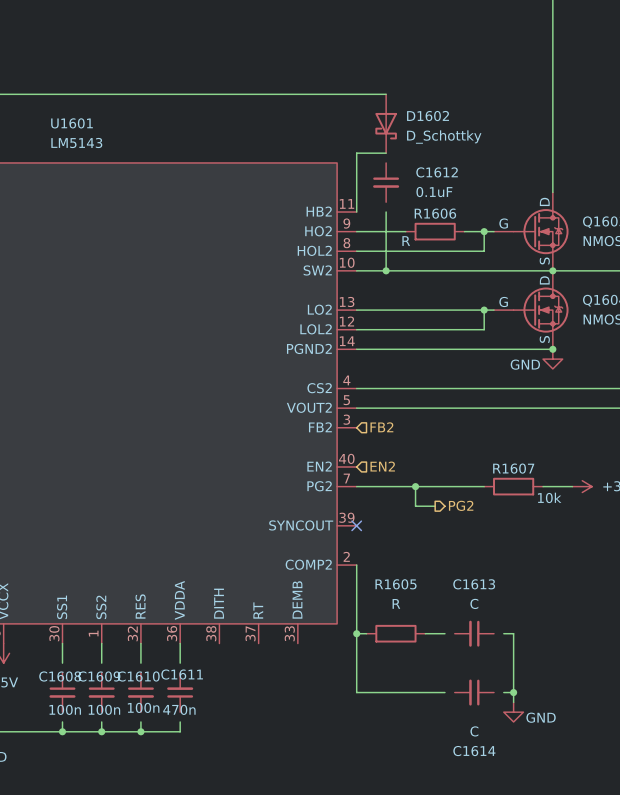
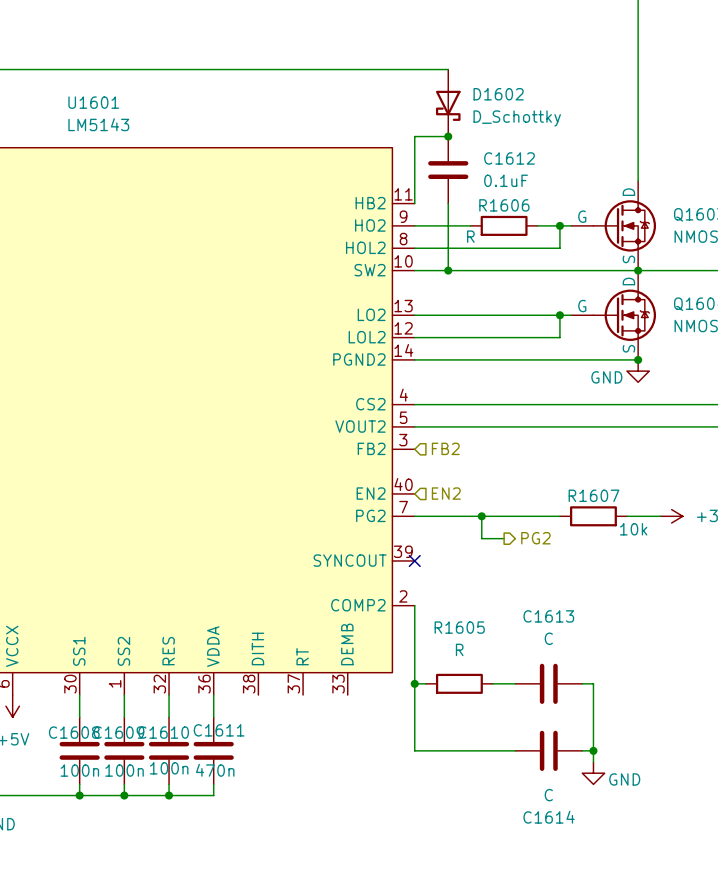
junction: none -> (448, 136)
C1612 symbol: [373, 162, 400, 203] -> [428, 136, 469, 204]
C1613 symbol: [454, 620, 495, 647] -> [515, 663, 583, 704]
C1608 symbol: [49, 672, 76, 713] -> [59, 717, 100, 785]
C1609 symbol: [88, 672, 115, 713] -> [104, 717, 145, 785]
C1610 symbol: [127, 672, 154, 713] -> [148, 717, 190, 785]
C1611 symbol: [167, 672, 194, 713] -> [193, 717, 234, 785]
C1614 symbol: [454, 679, 495, 706] -> [515, 730, 583, 771]

